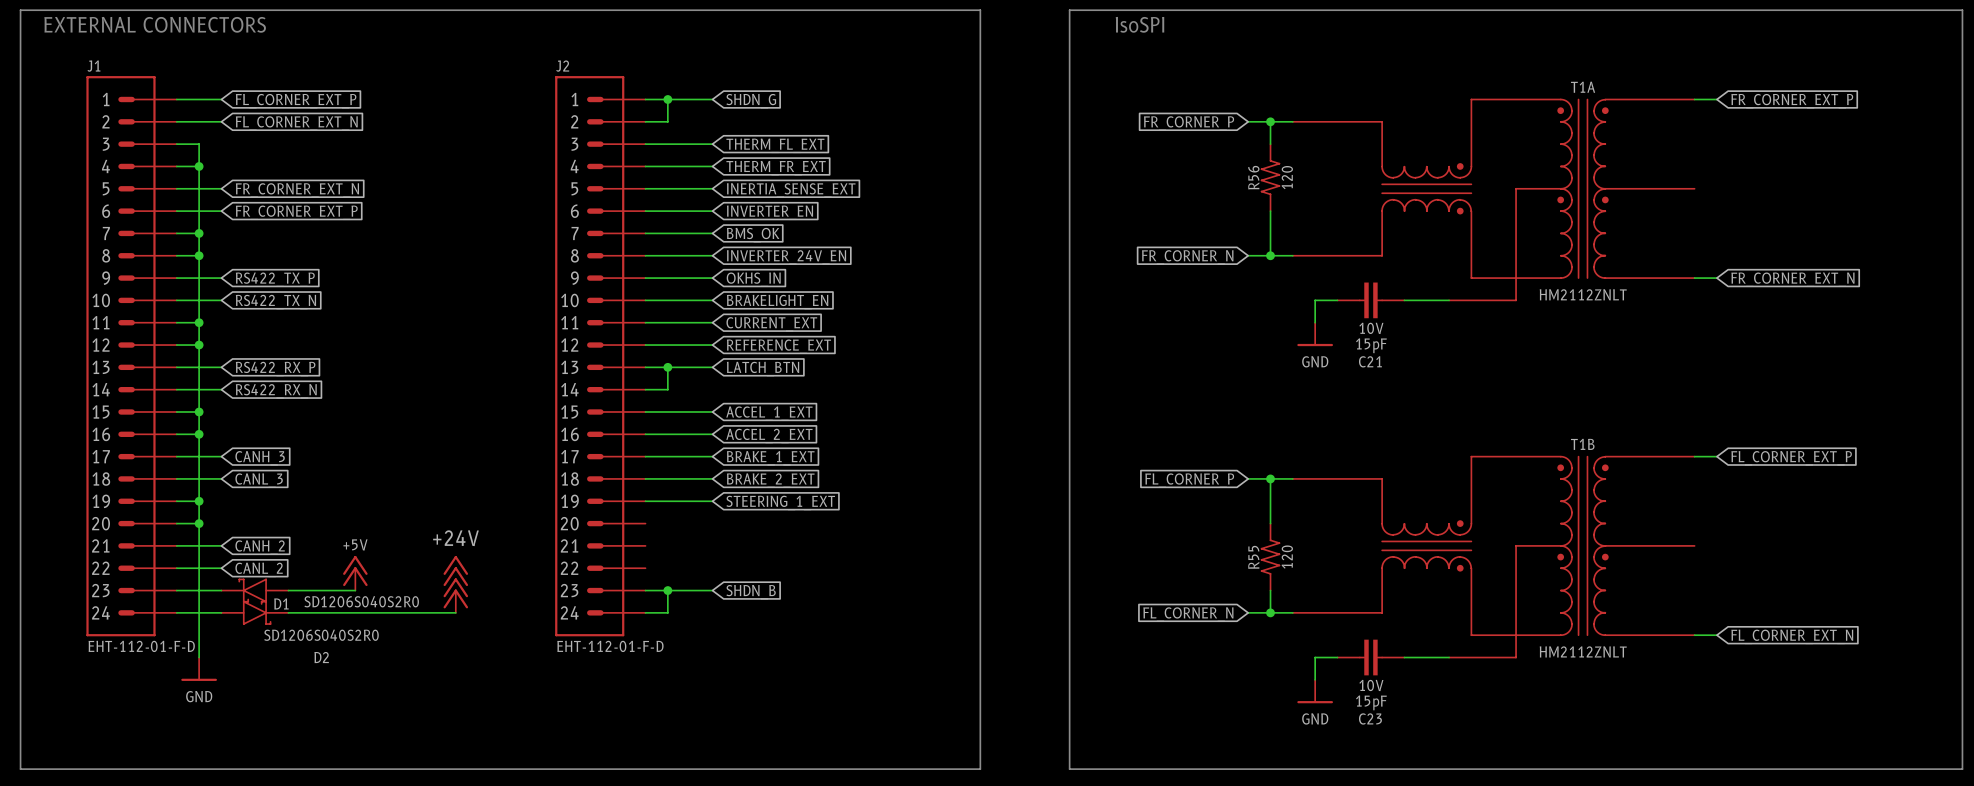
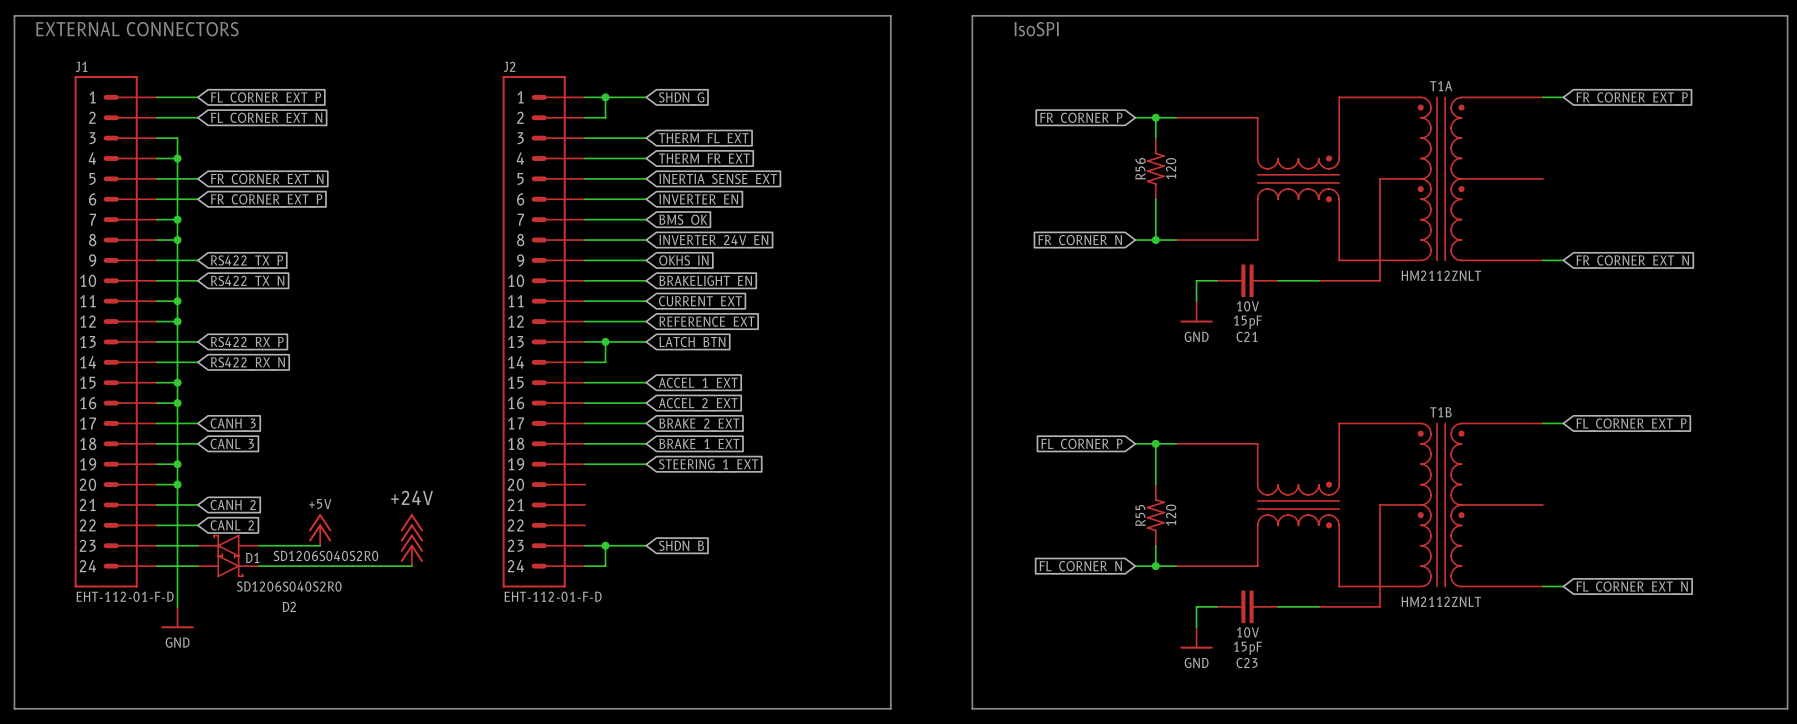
global label: BRAKE_1_EXT (770, 458) -> BRAKE_2_EXT (699, 424)
global label: BRAKE_2_EXT (770, 480) -> BRAKE_1_EXT (699, 445)

